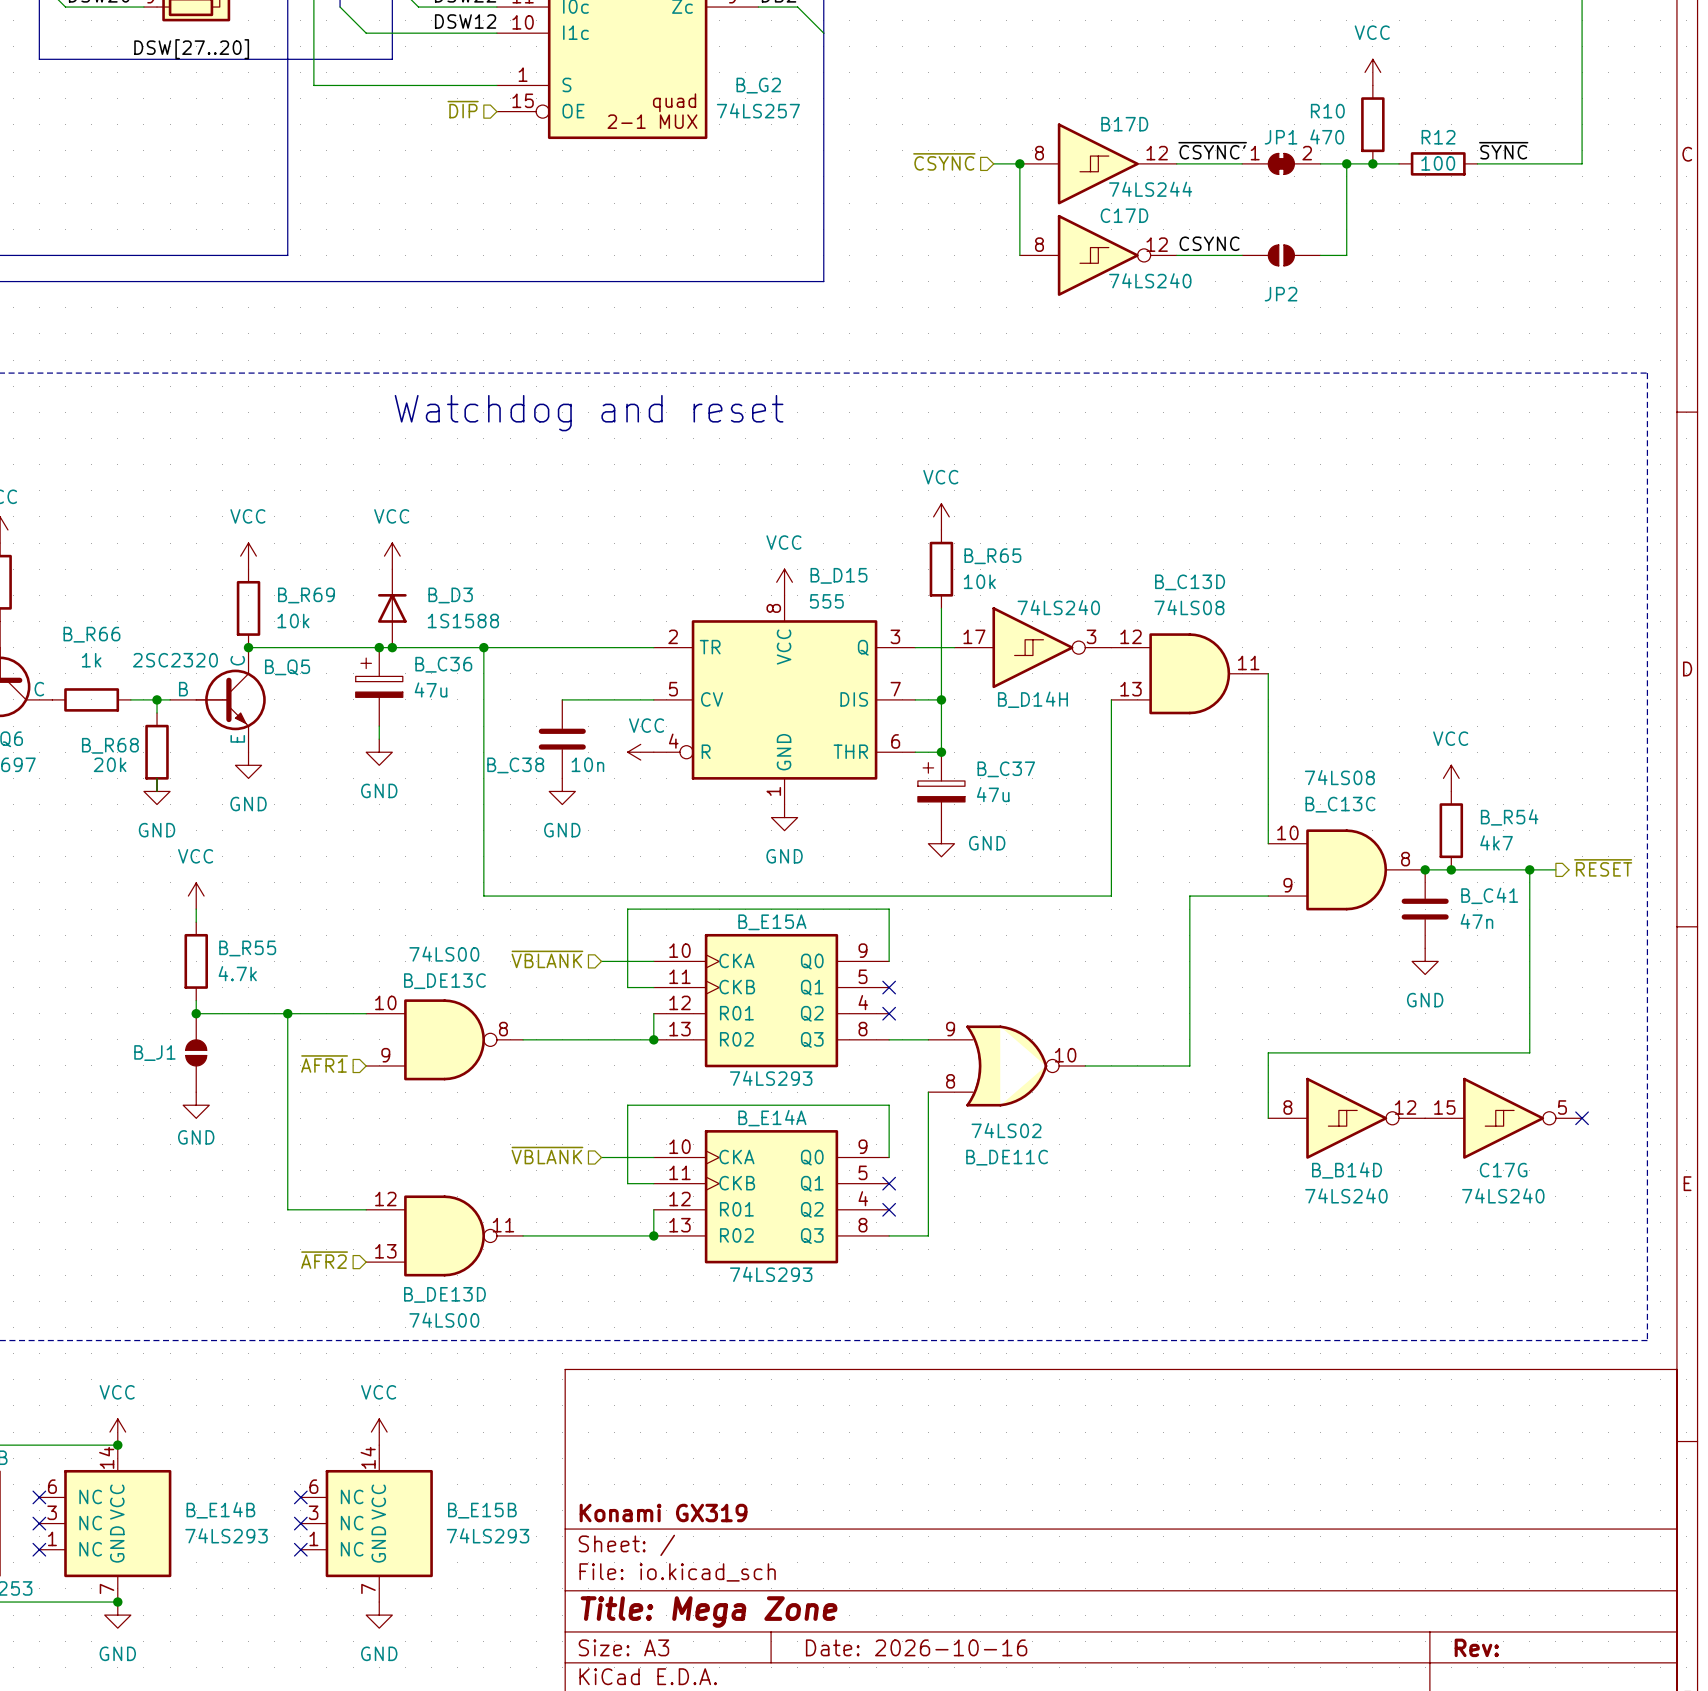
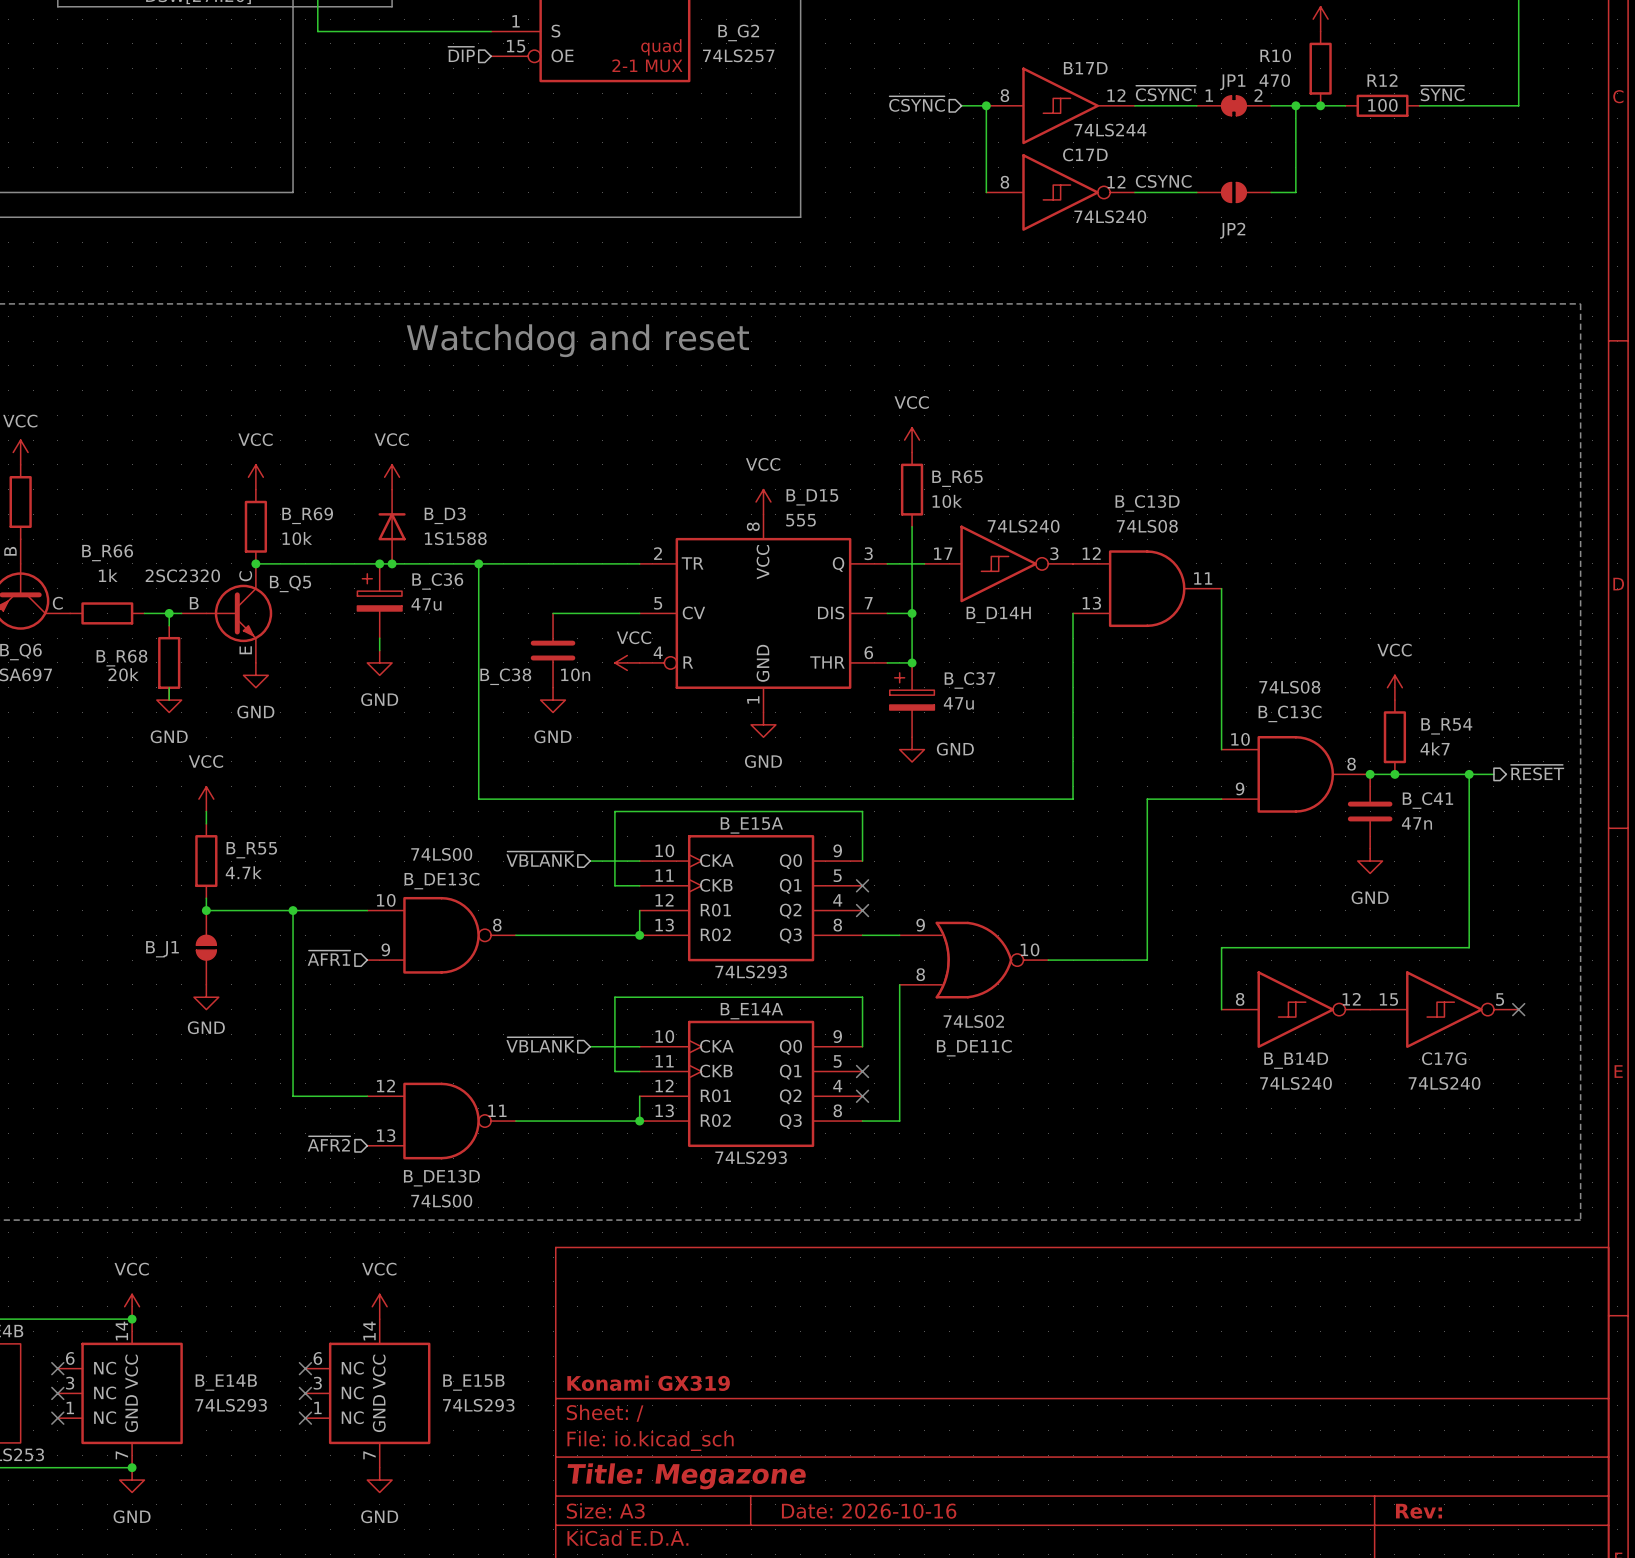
title block: Title: Mega Zone (709, 1611) -> Title: Megazone (686, 1476)

